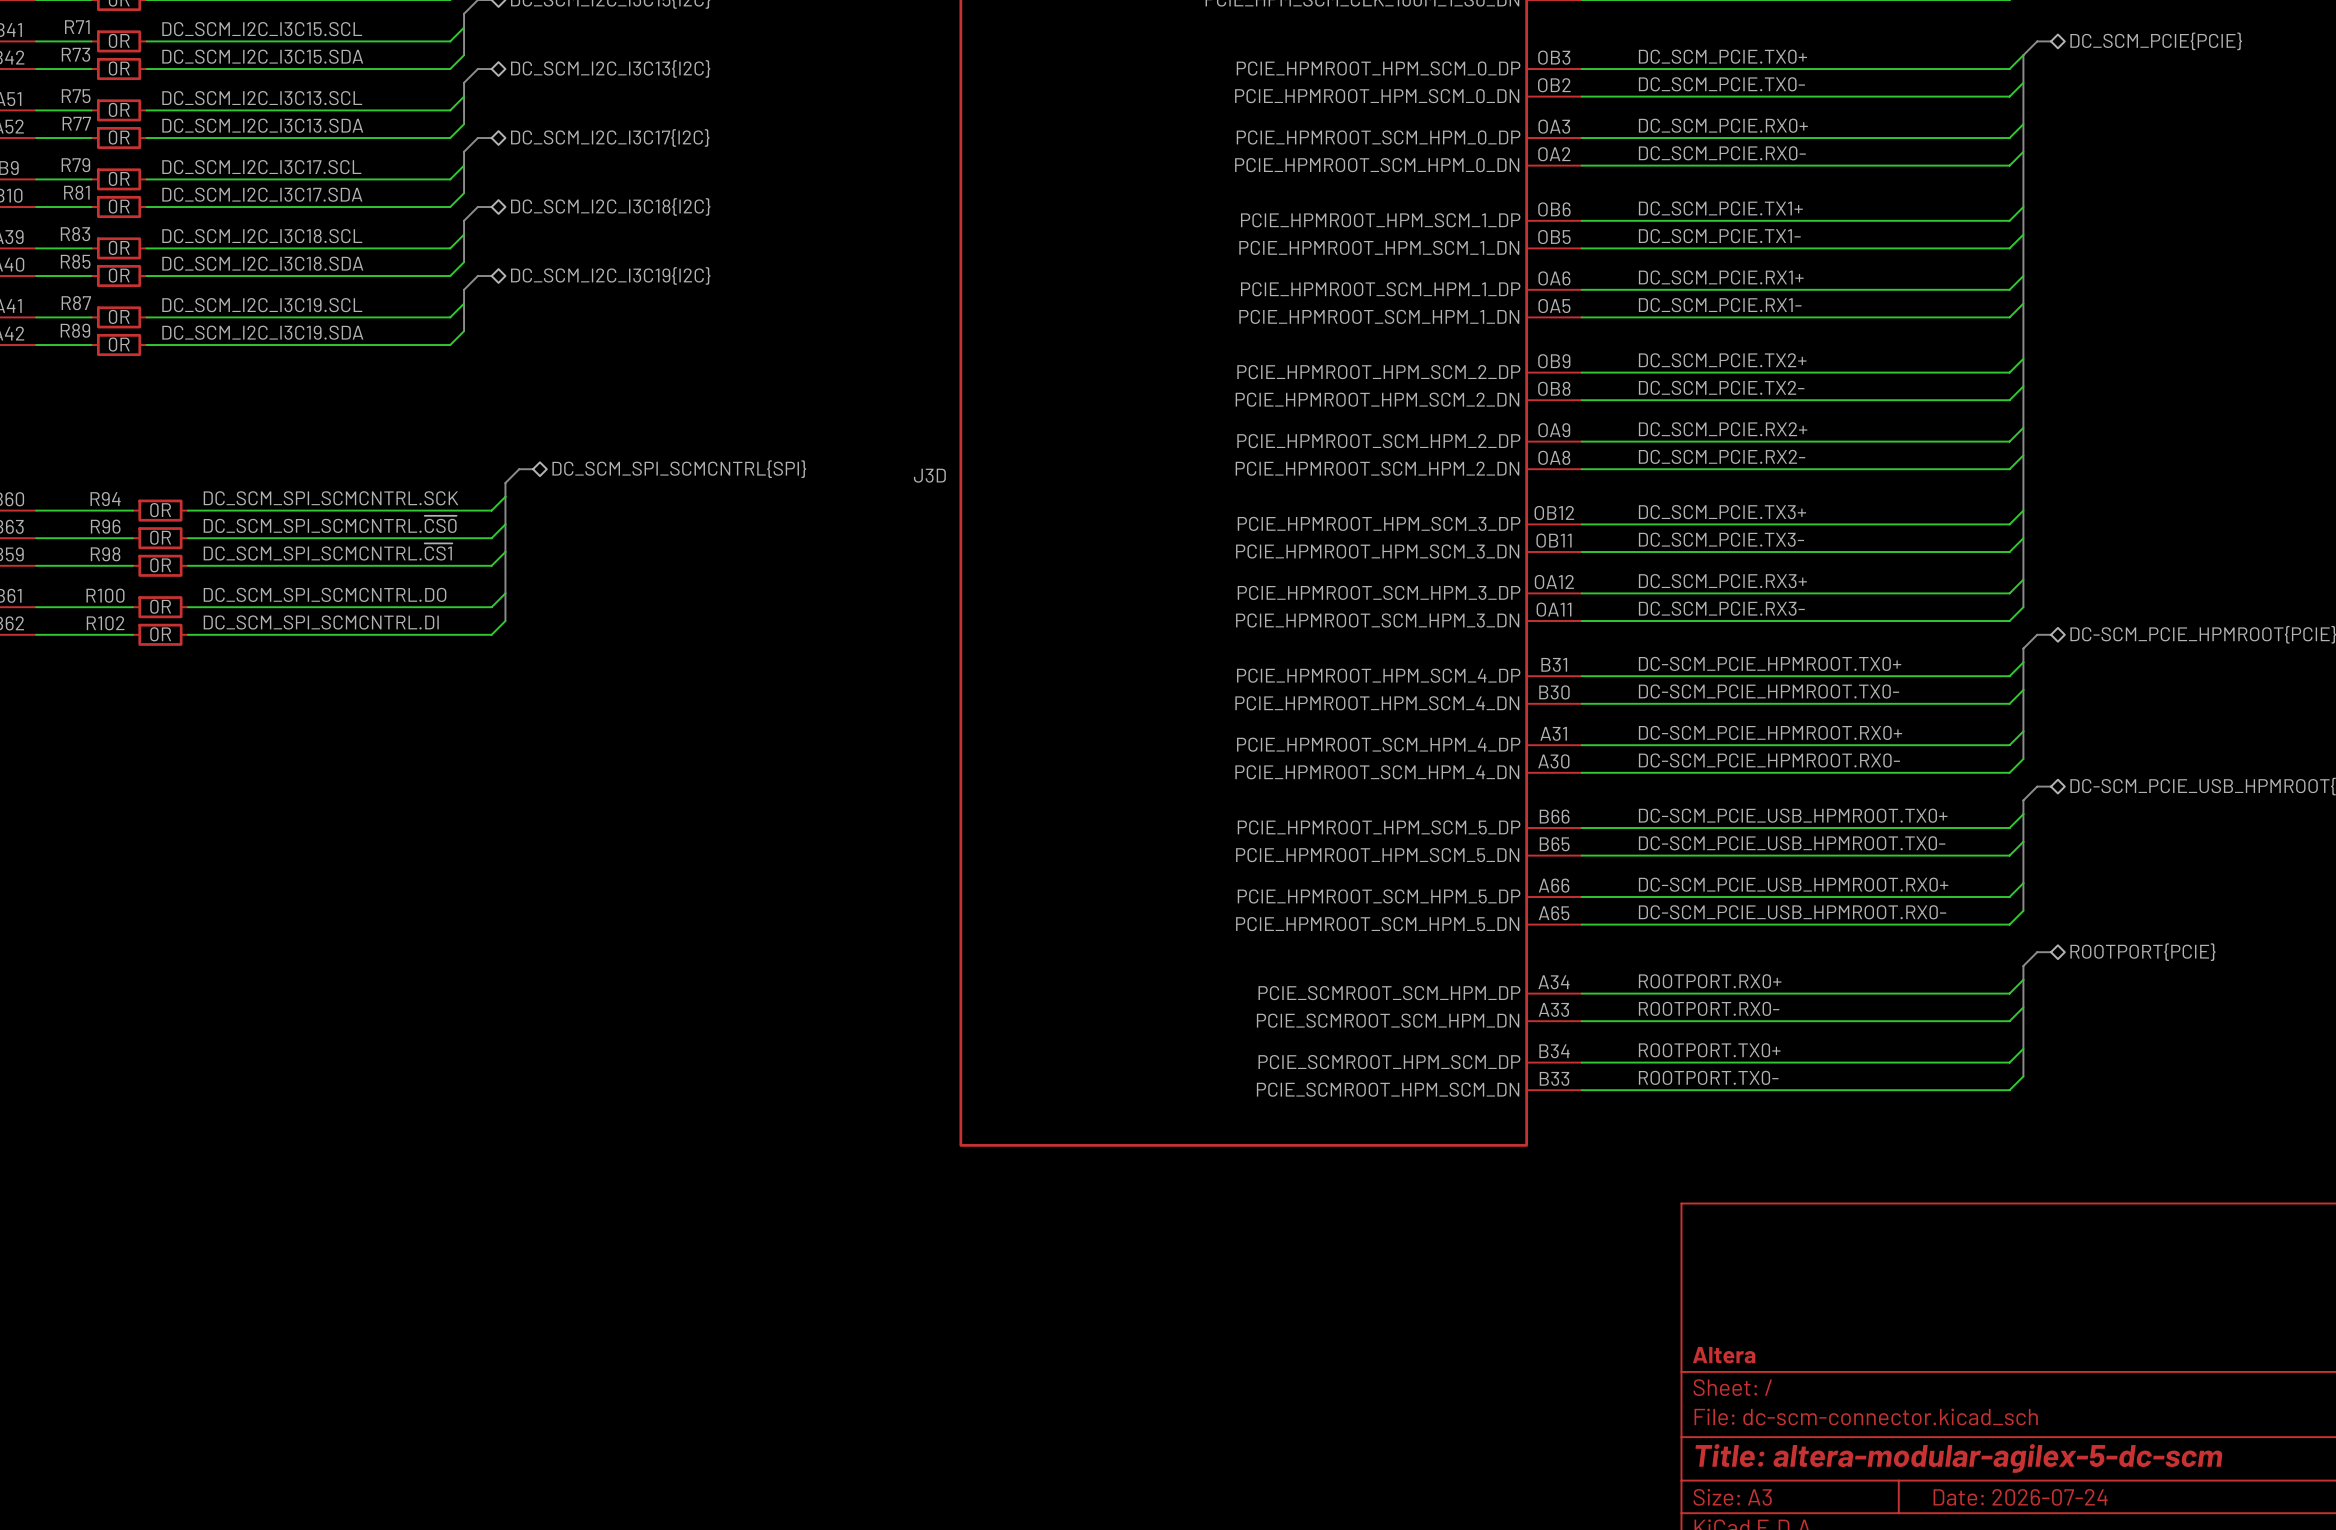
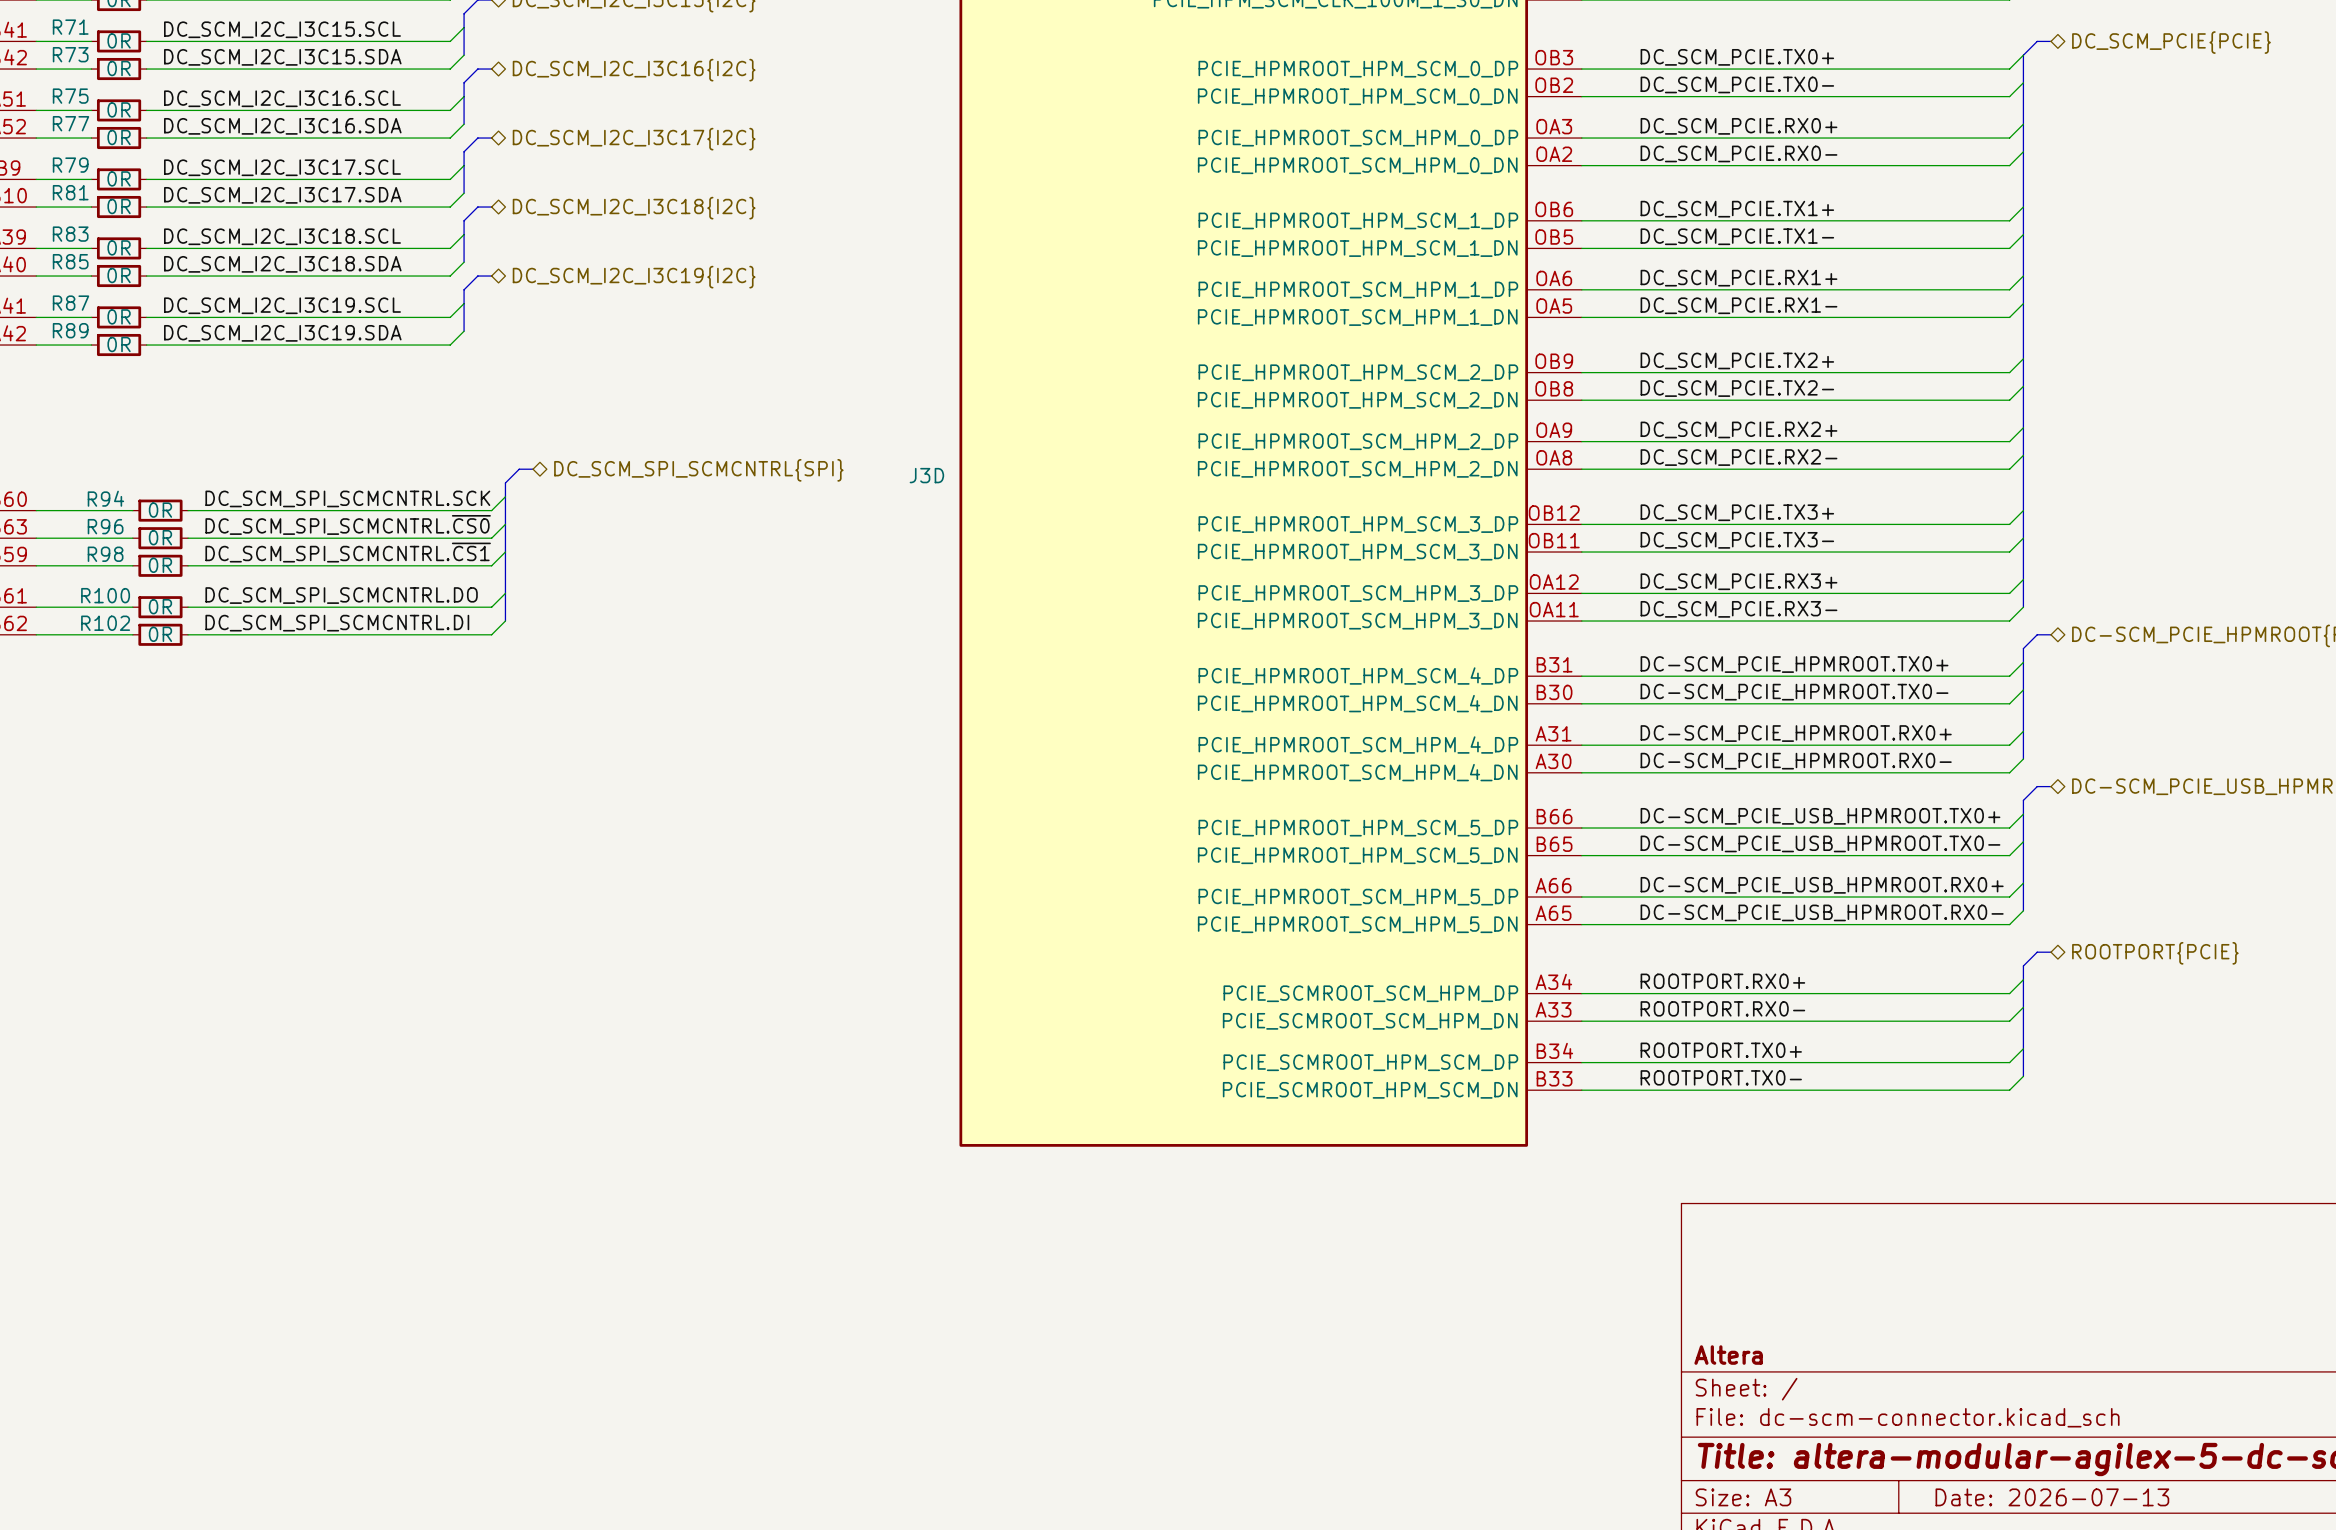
hierarchical label: DC_SCM_I2C_I3C13{I2C} (610, 68) -> DC_SCM_I2C_I3C16{I2C} (634, 70)
label: DC_SCM_I2C_I3C13.SCL (262, 98) -> DC_SCM_I2C_I3C16.SCL (282, 98)
label: DC_SCM_I2C_I3C13.SDA (262, 125) -> DC_SCM_I2C_I3C16.SDA (282, 126)
title block: Date: 2026-07-24 (2020, 1497) -> Date: 2026-07-13 (2052, 1497)

